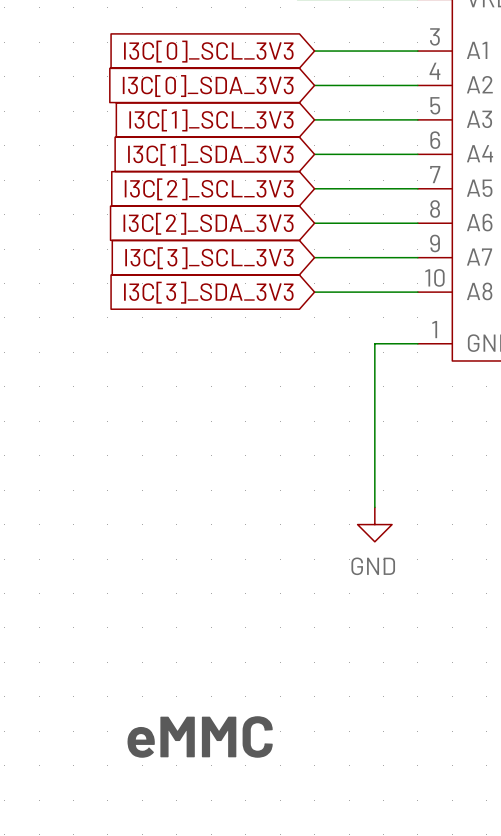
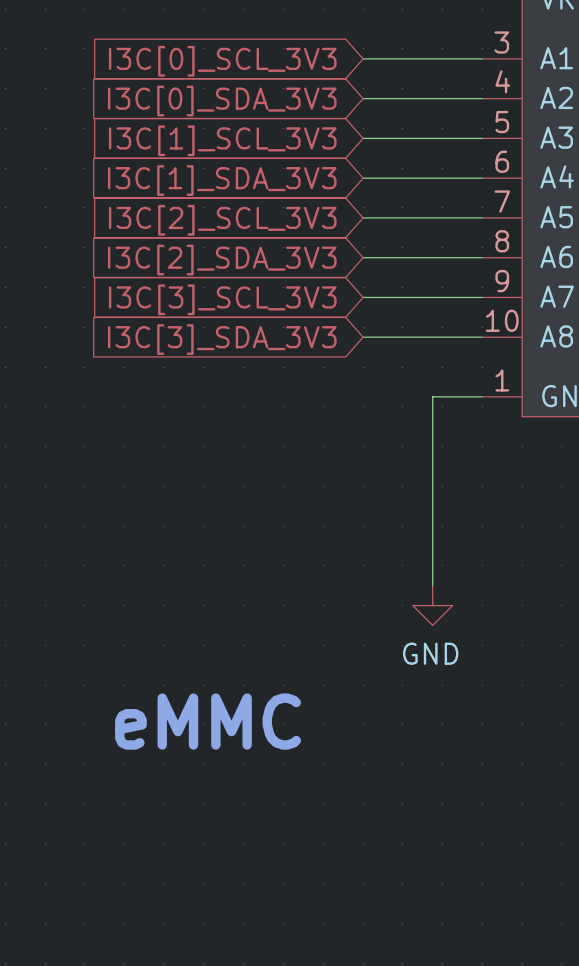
text position: eMMC (200, 736) -> eMMC (208, 721)

